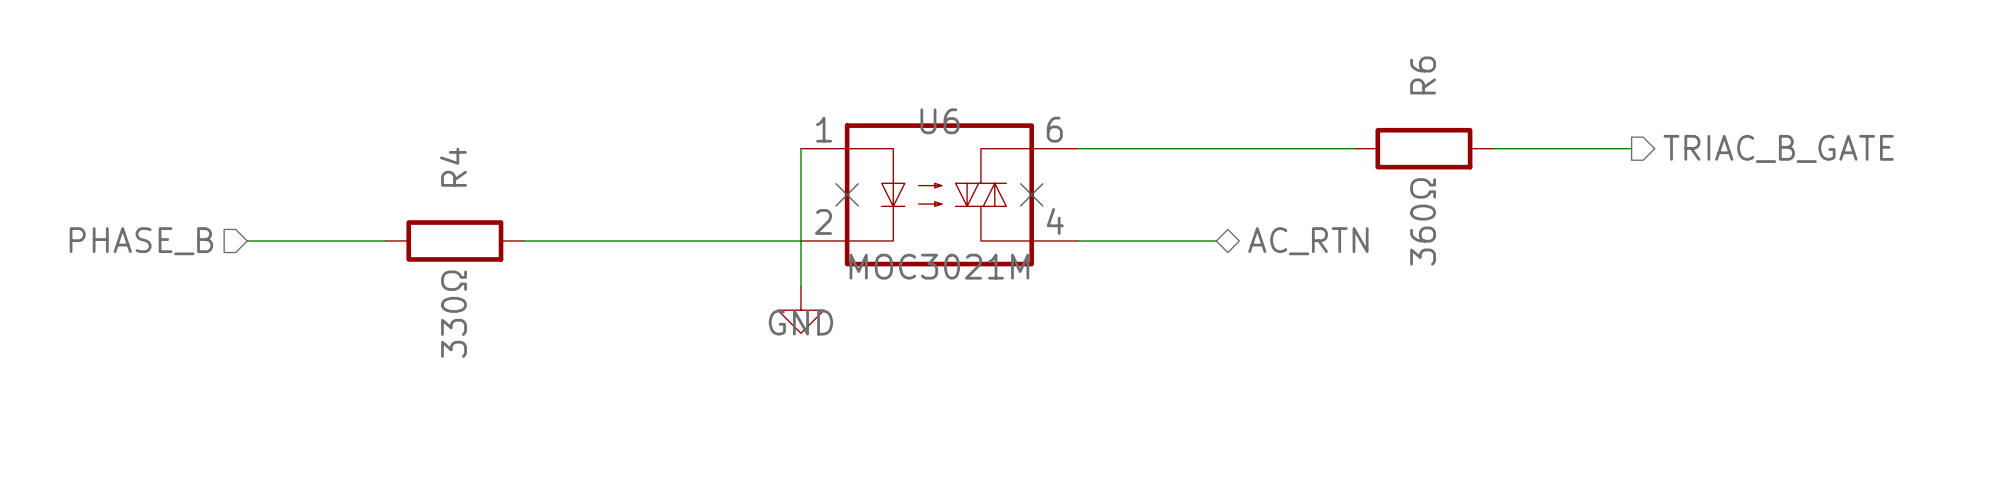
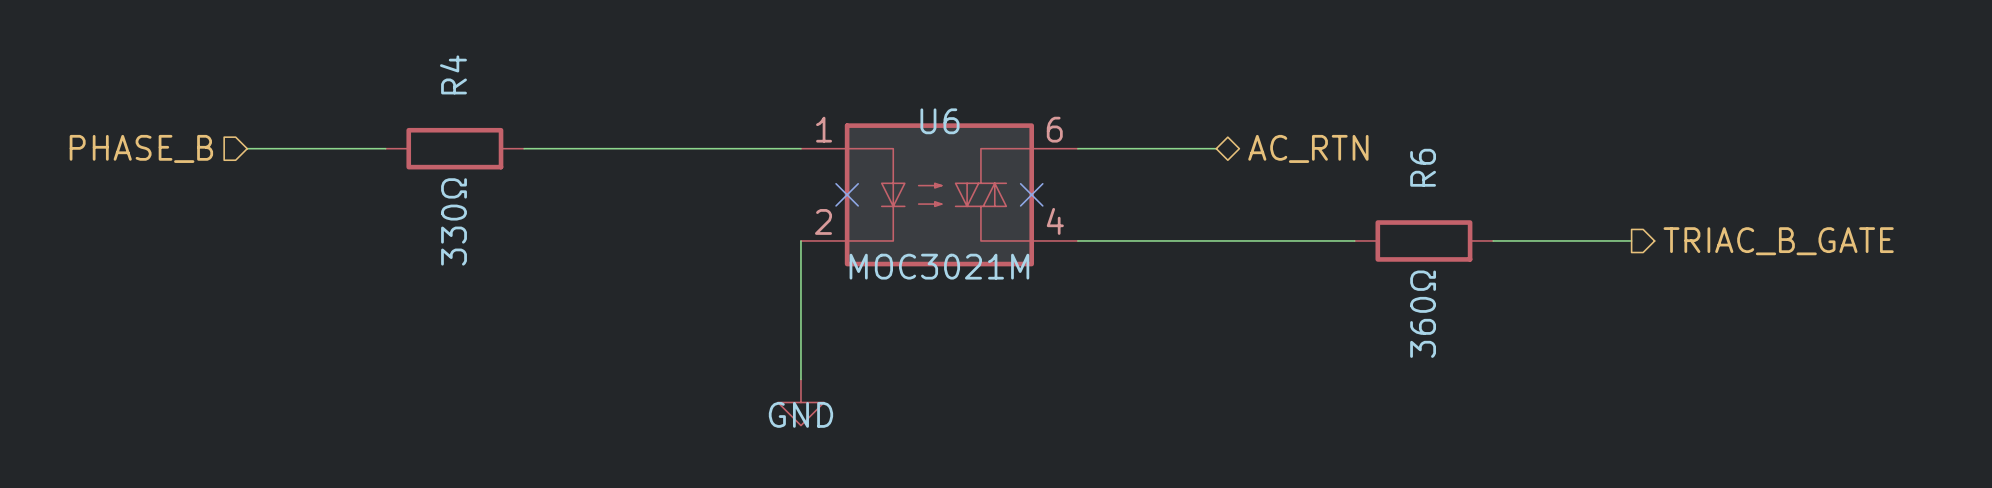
wire: (800, 148) (800, 240) (524, 240) -> (800, 148) (524, 148)
wire: (1216, 148) (1354, 148) -> (1216, 240) (1354, 240)
R6 position: (1423, 148) -> (1423, 240)
wire: (1493, 148) (1631, 148) -> (1493, 240) (1631, 240)
hierarchical label position: TRIAC_B_GATE (1778, 148) -> TRIAC_B_GATE (1778, 241)
wire: (247, 240) (385, 240) -> (247, 148) (385, 148)
R4 position: (454, 240) -> (454, 148)
hierarchical label position: PHASE_B (141, 241) -> PHASE_B (141, 148)
hierarchical label position: AC_RTN (1308, 241) -> AC_RTN (1308, 148)
wire: none -> (800, 287) (800, 379)
power symbol position: GND (800, 310) -> GND (800, 402)

